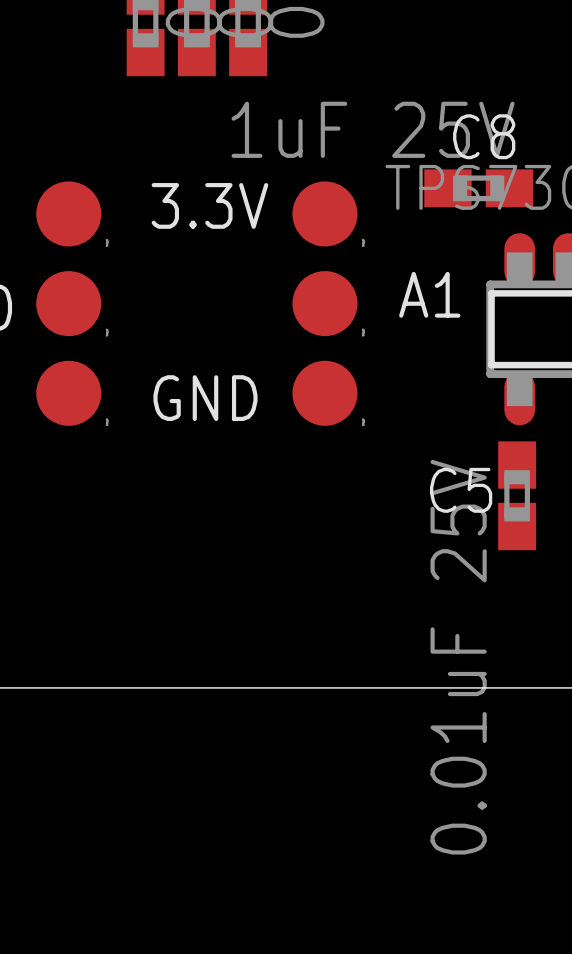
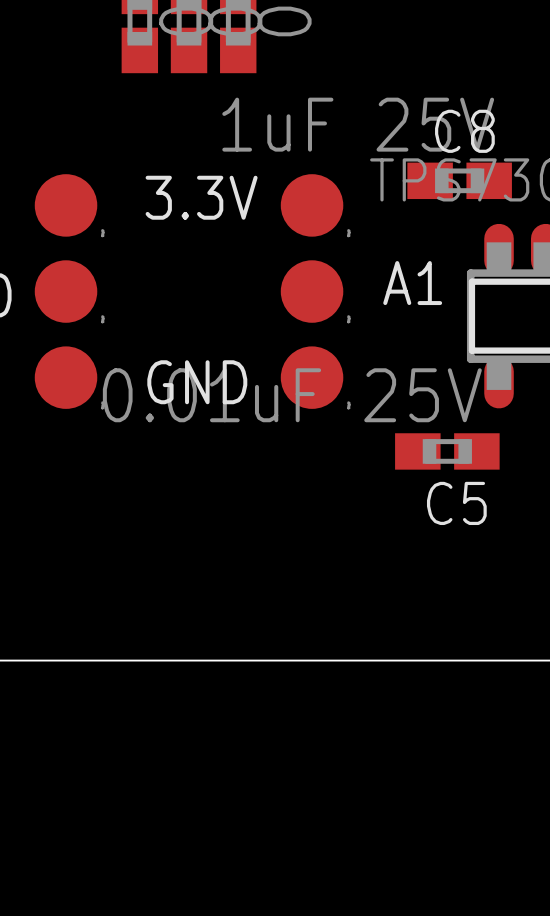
C5 rotation: 0° (517, 495) -> 90° clockwise (447, 451)

